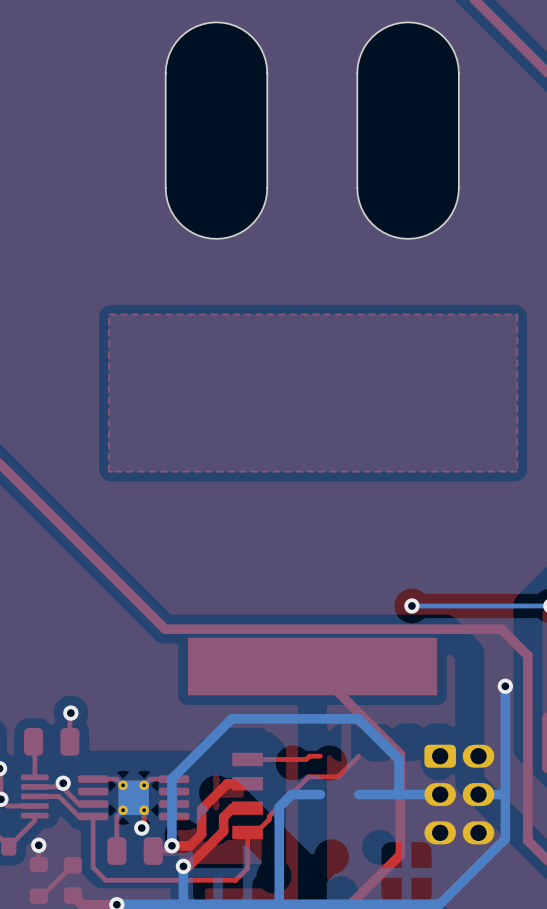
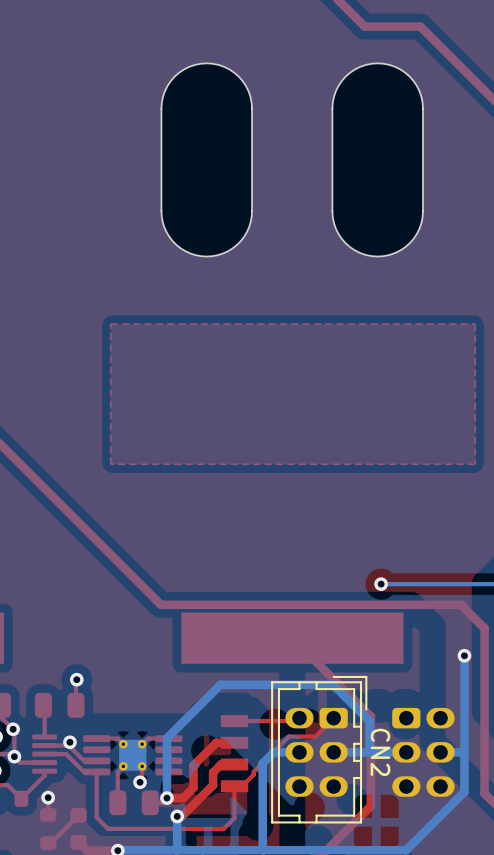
CN2: none -> (319, 749)

